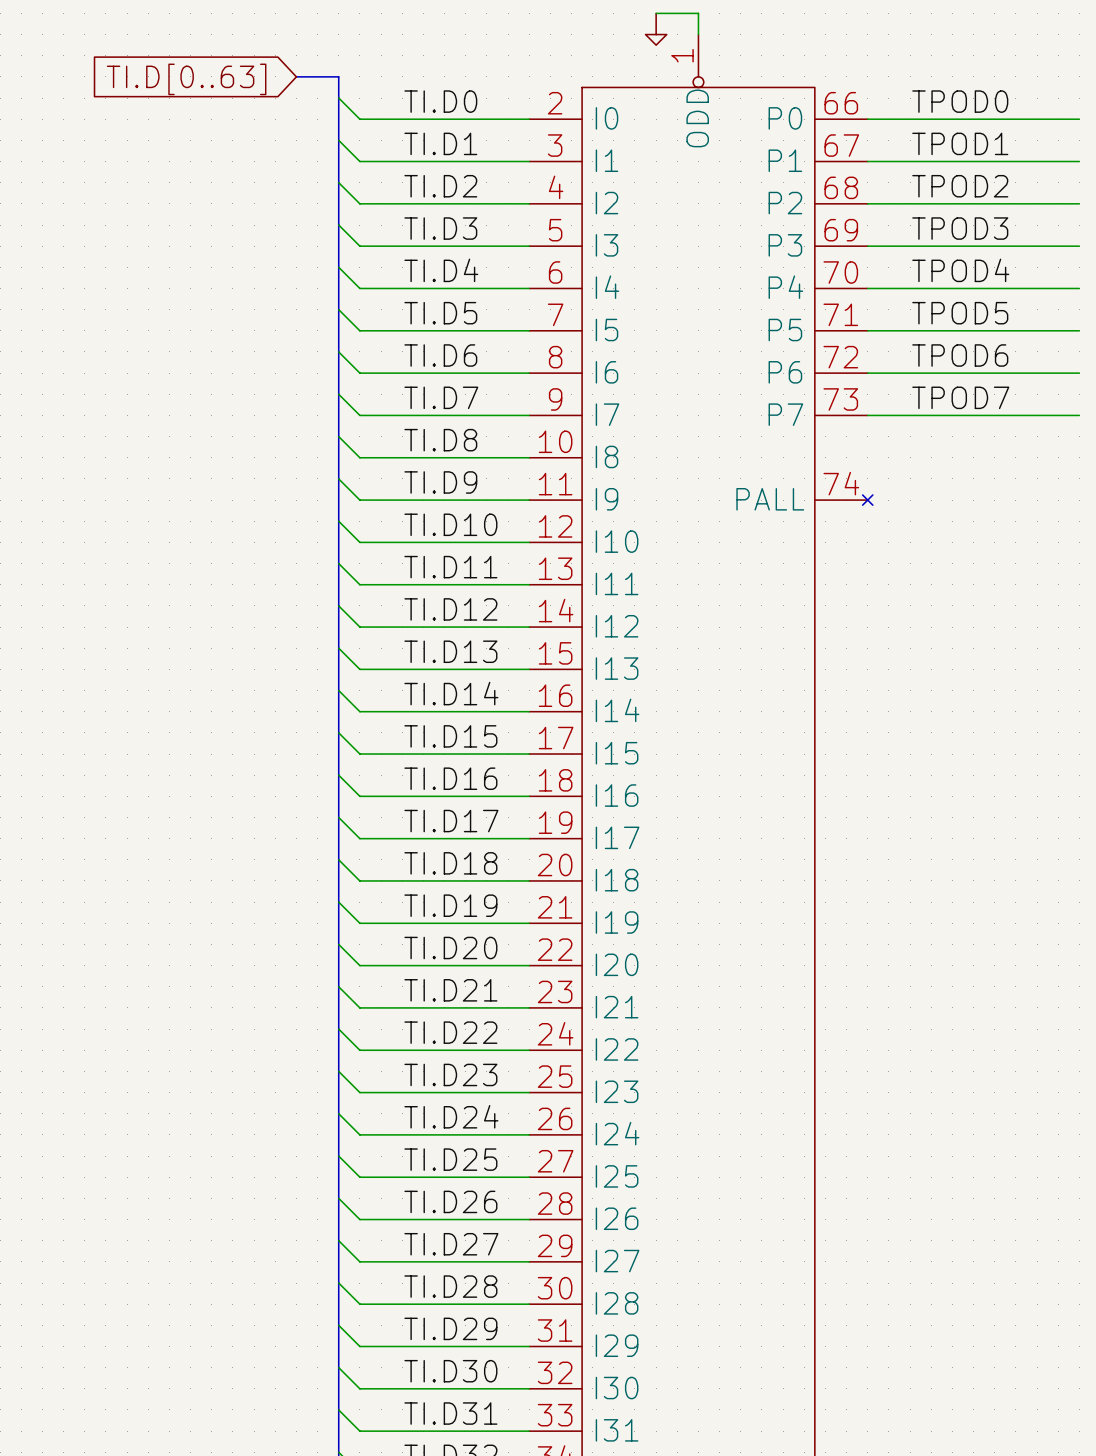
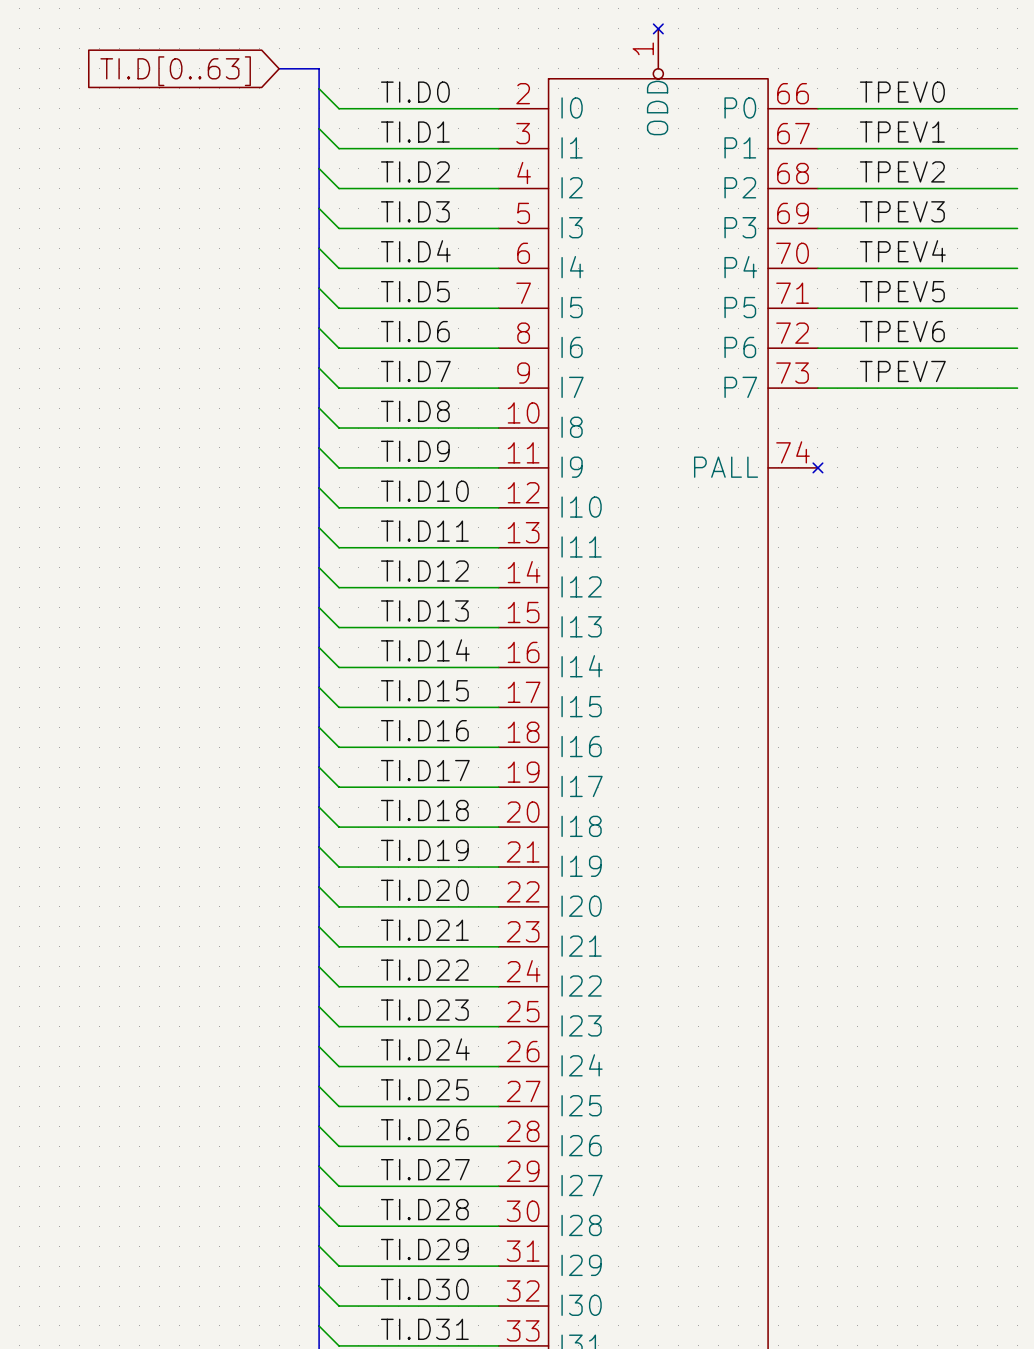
wire: (656, 13) (698, 13) (698, 34) -> none
power symbol: (656, 29) -> none
no-connect mark: none -> (658, 28)
label: TPOD0 (960, 101) -> TPEV0 (902, 92)
label: TPOD1 (960, 143) -> TPEV1 (902, 132)
label: TPOD2 (960, 186) -> TPEV2 (902, 171)
label: TPOD3 (960, 228) -> TPEV3 (902, 211)
label: TPOD4 (960, 270) -> TPEV4 (902, 251)
label: TPOD5 (960, 313) -> TPEV5 (902, 291)
label: TPOD6 (960, 355) -> TPEV6 (902, 331)
label: TPOD7 (960, 397) -> TPEV7 (902, 371)

